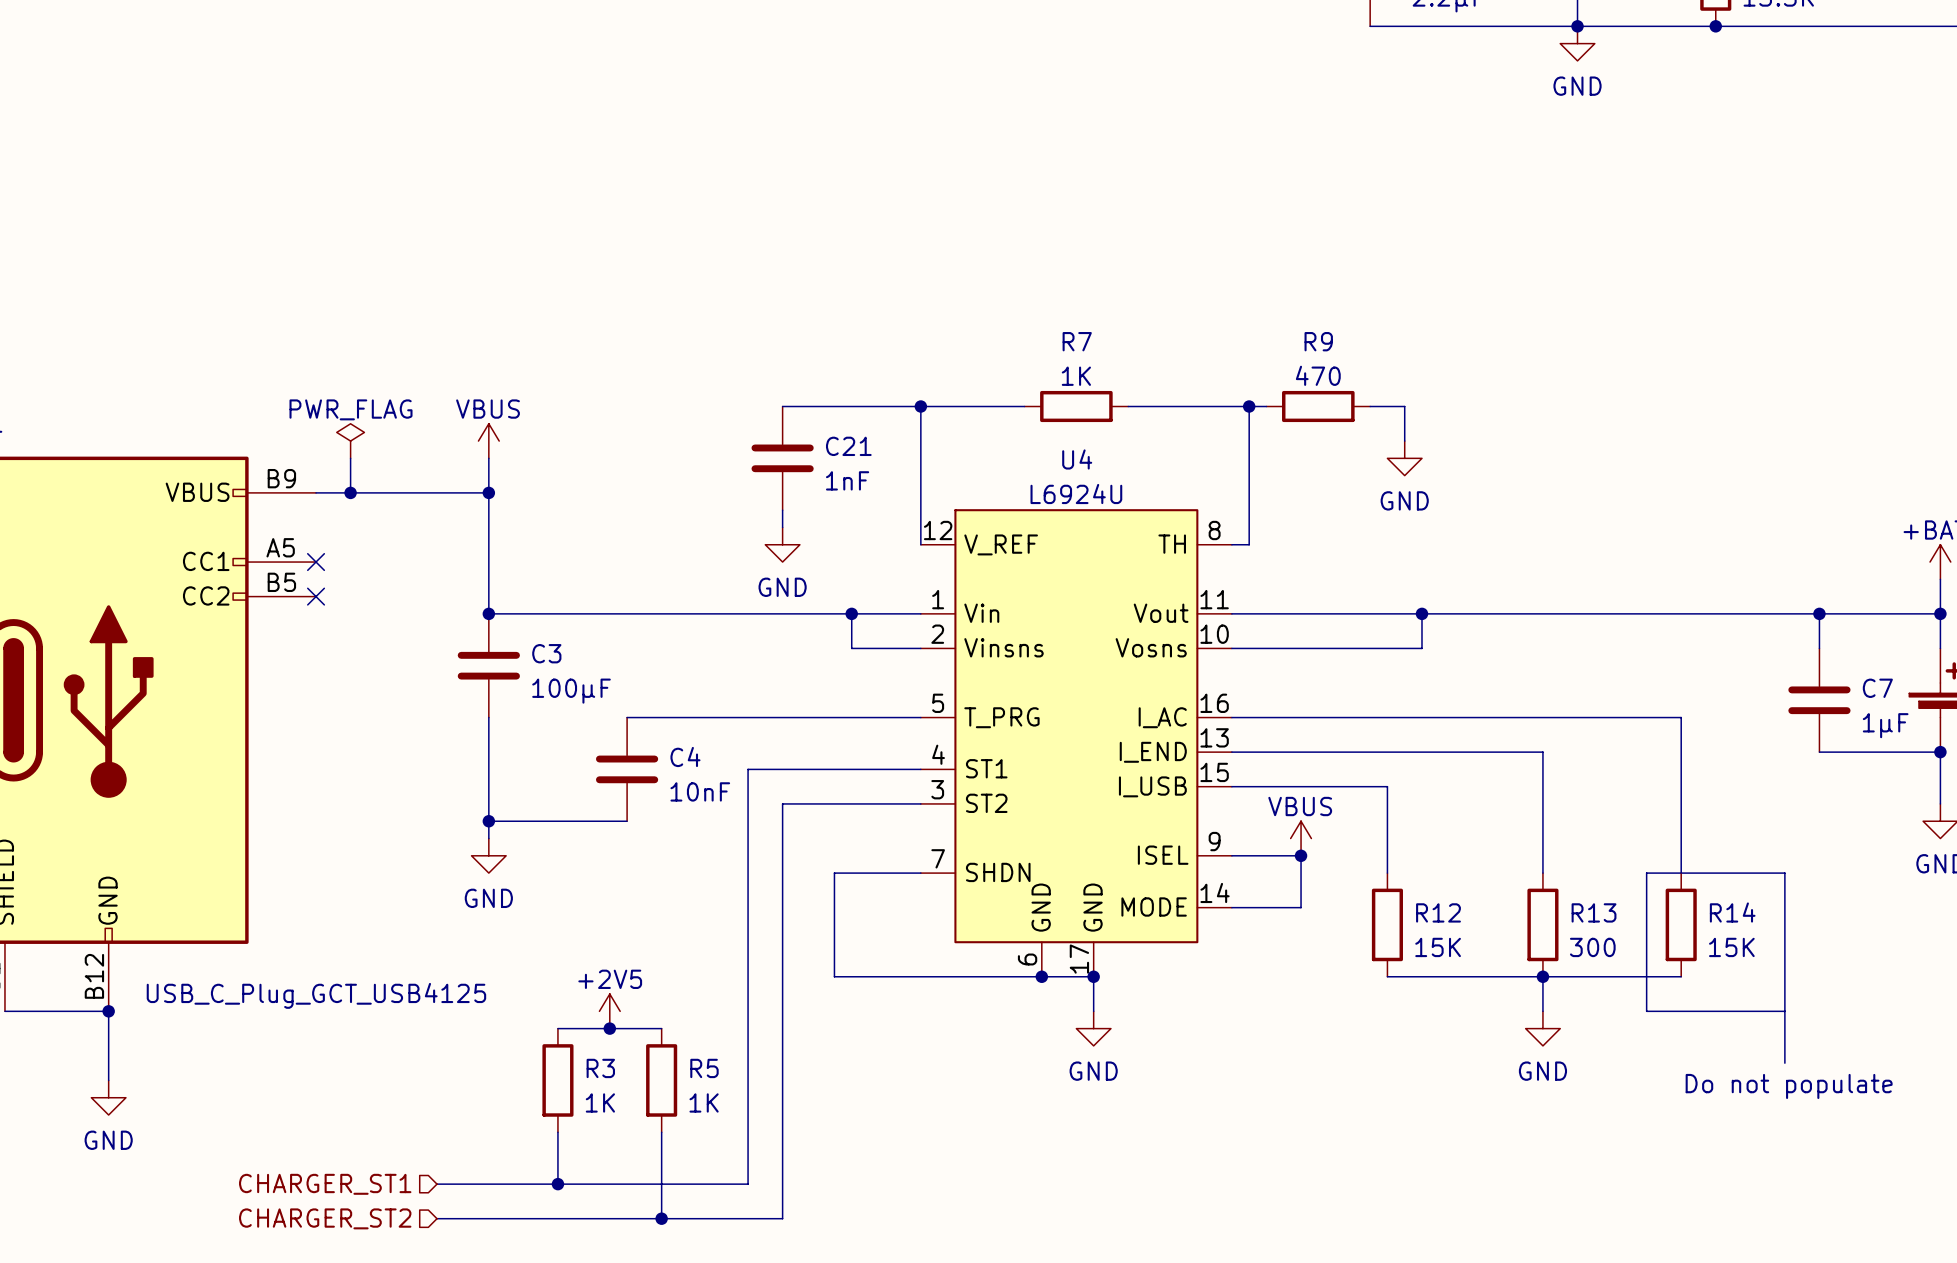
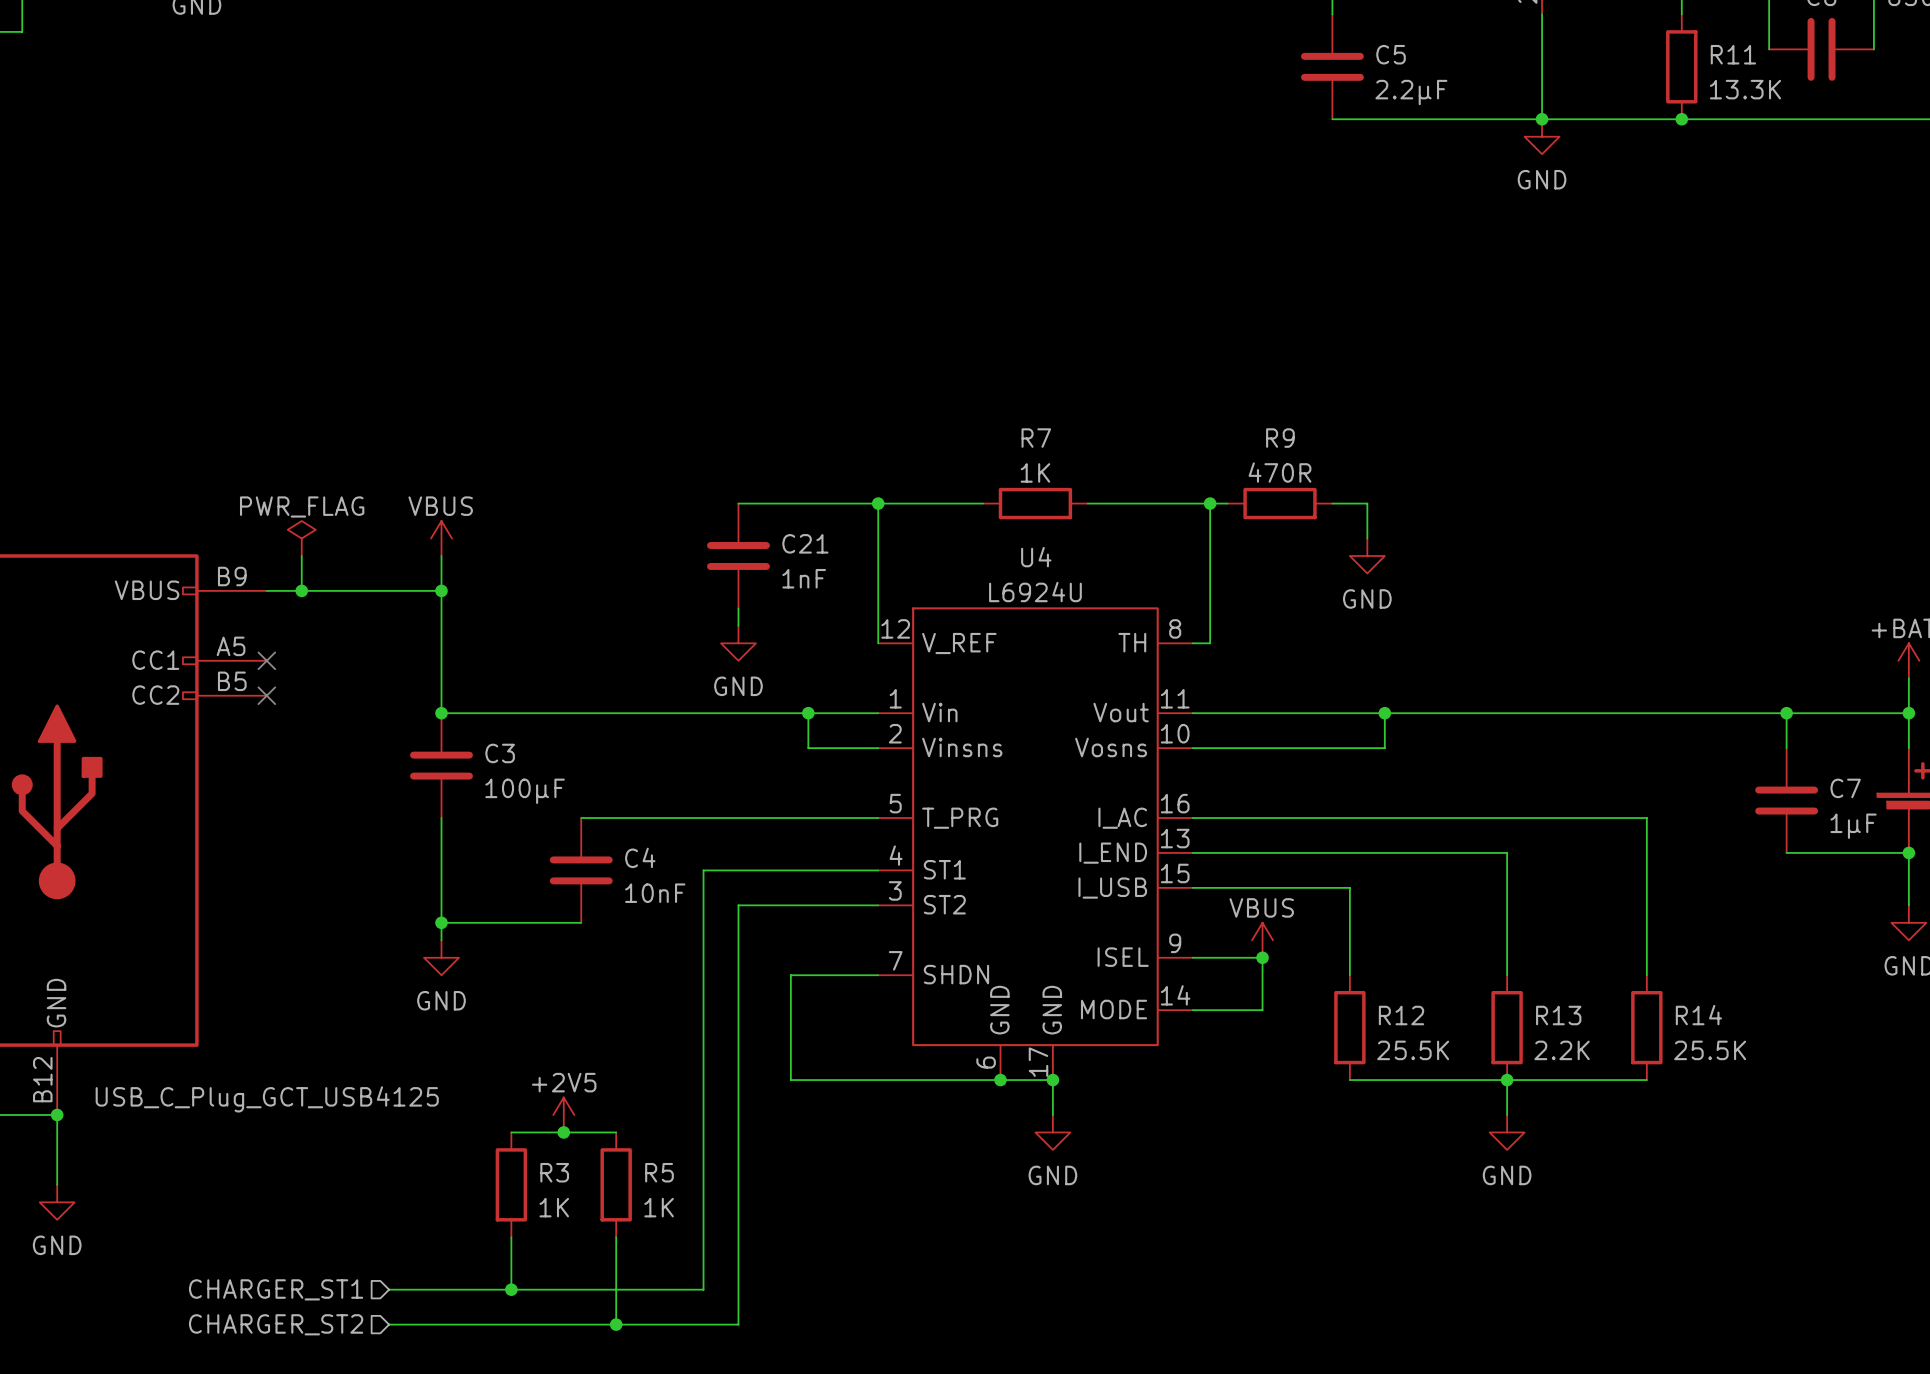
R9 value: 470 (1318, 375) -> 470R (1280, 472)
R12 value: 15K (1438, 947) -> 25.5K (1413, 1050)
R13 value: 300 (1592, 947) -> 2.2K (1562, 1050)
R14 value: 15K (1731, 947) -> 25.5K (1710, 1050)
line: (1784, 1011) (1646, 1011) (1646, 873) (1784, 873) (1784, 1063) -> none
text: Do not populate (1789, 1086) -> none

